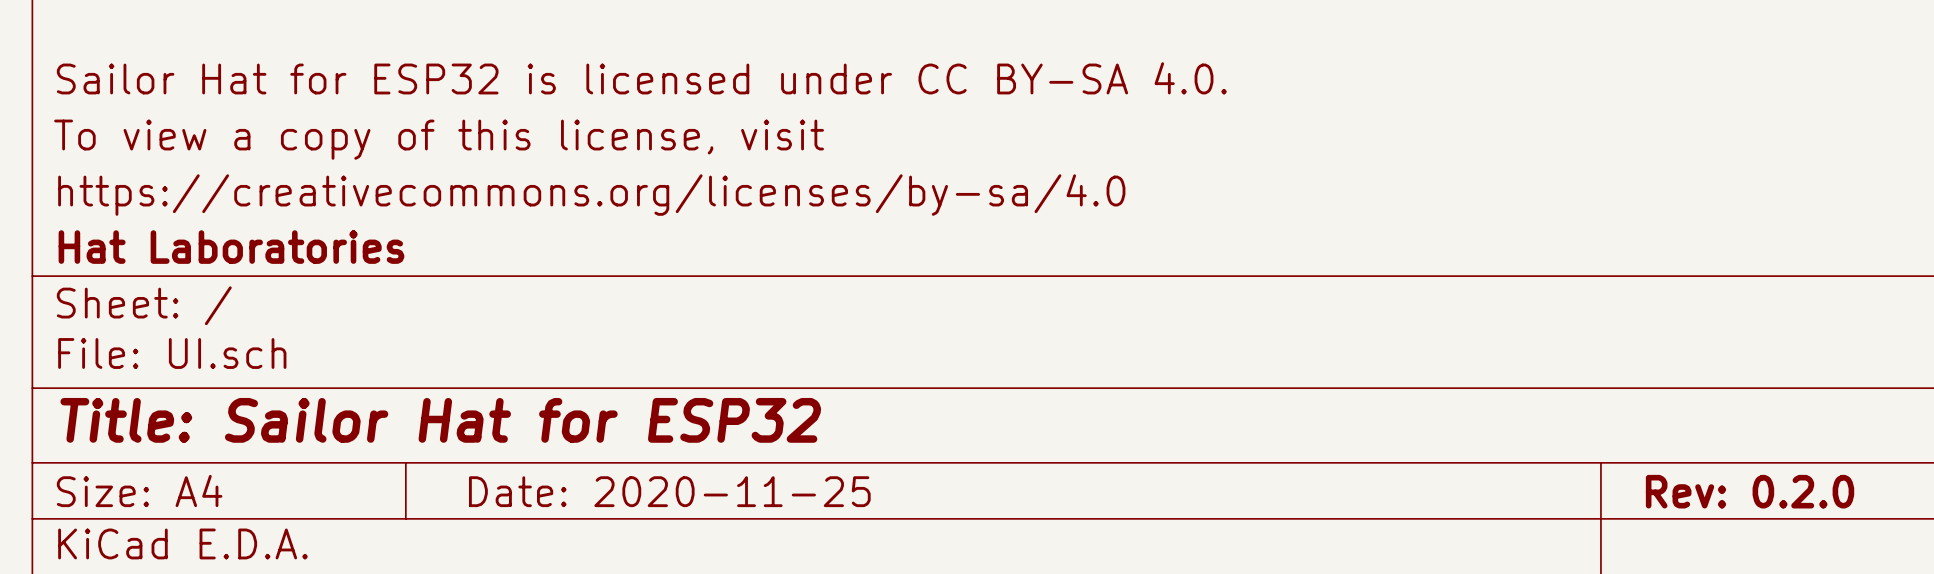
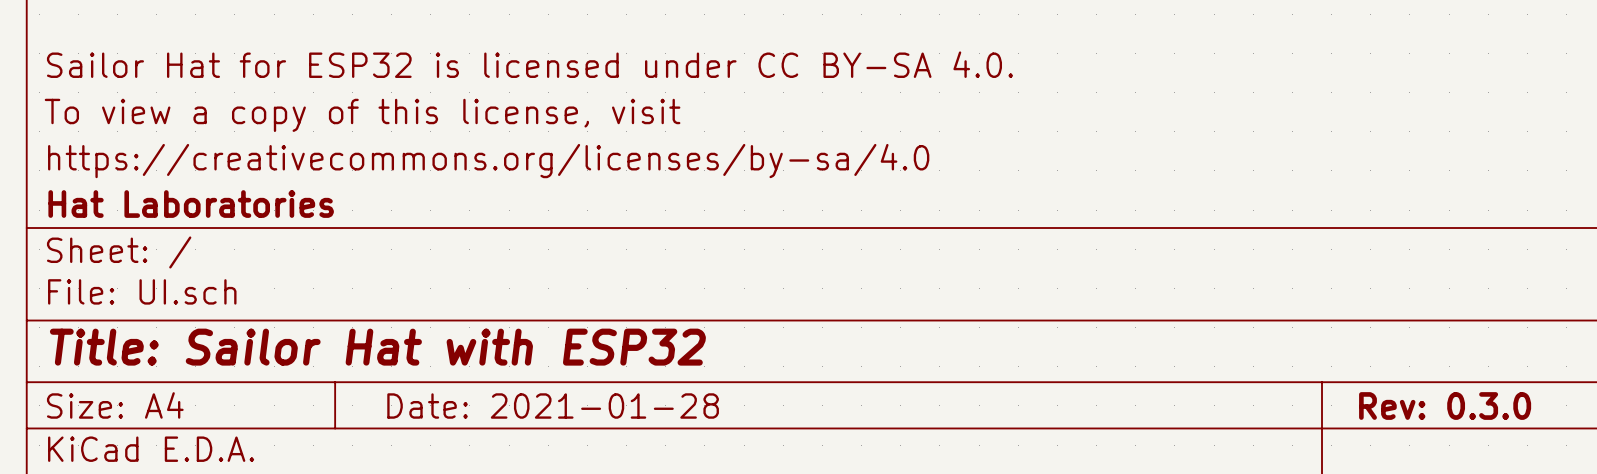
title block: Title: Sailor Hat for ESP32 (440, 420) -> Title: Sailor Hat with ESP32 (377, 347)
title block: Date: 2020-11-25 (669, 491) -> Date: 2021-01-28 (553, 406)
title block: Rev: 0.2.0 (1750, 491) -> Rev: 0.3.0 (1445, 406)

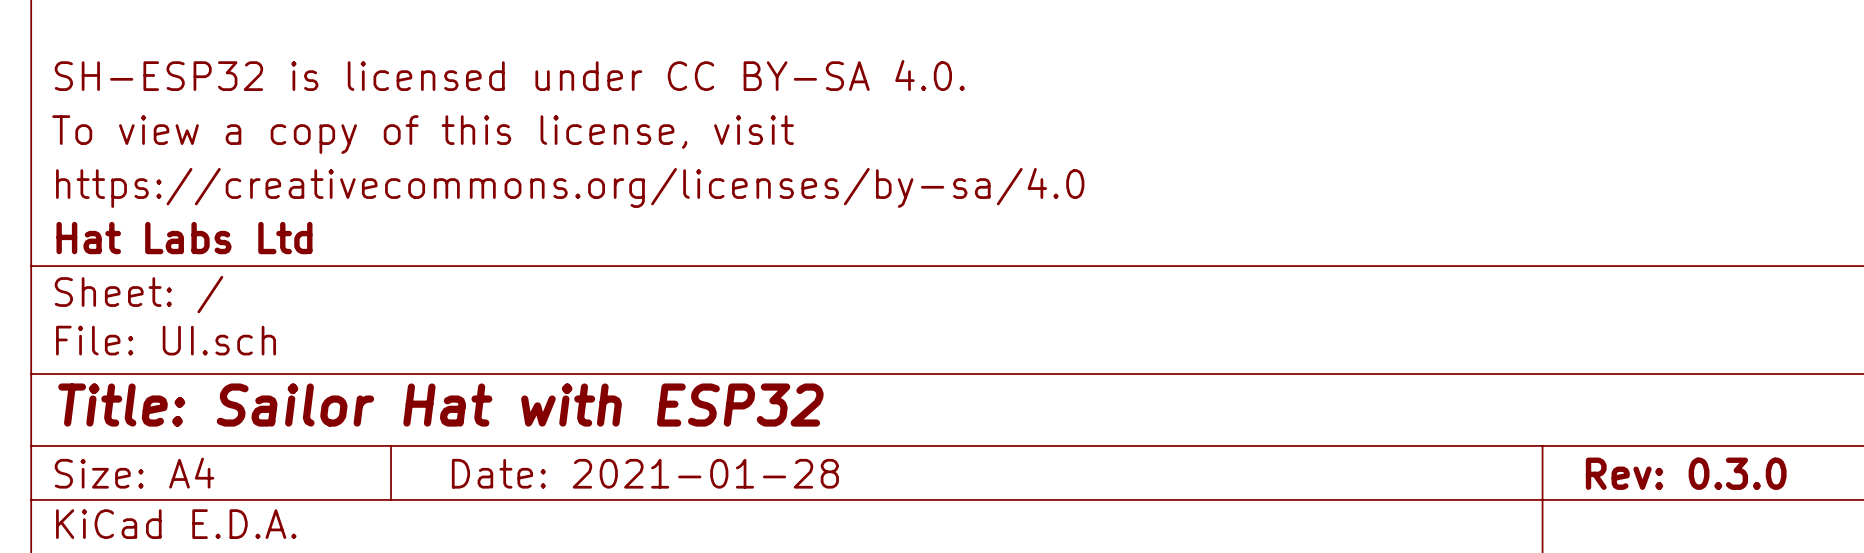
title block: Sailor Hat for ESP32 is licensed under CC BY-SA 4.0. (529, 64) -> SH-ESP32 is licensed under CC BY-SA 4.0. (509, 75)
title block: Hat Laboratories (191, 204) -> Hat Labs Ltd (184, 238)

